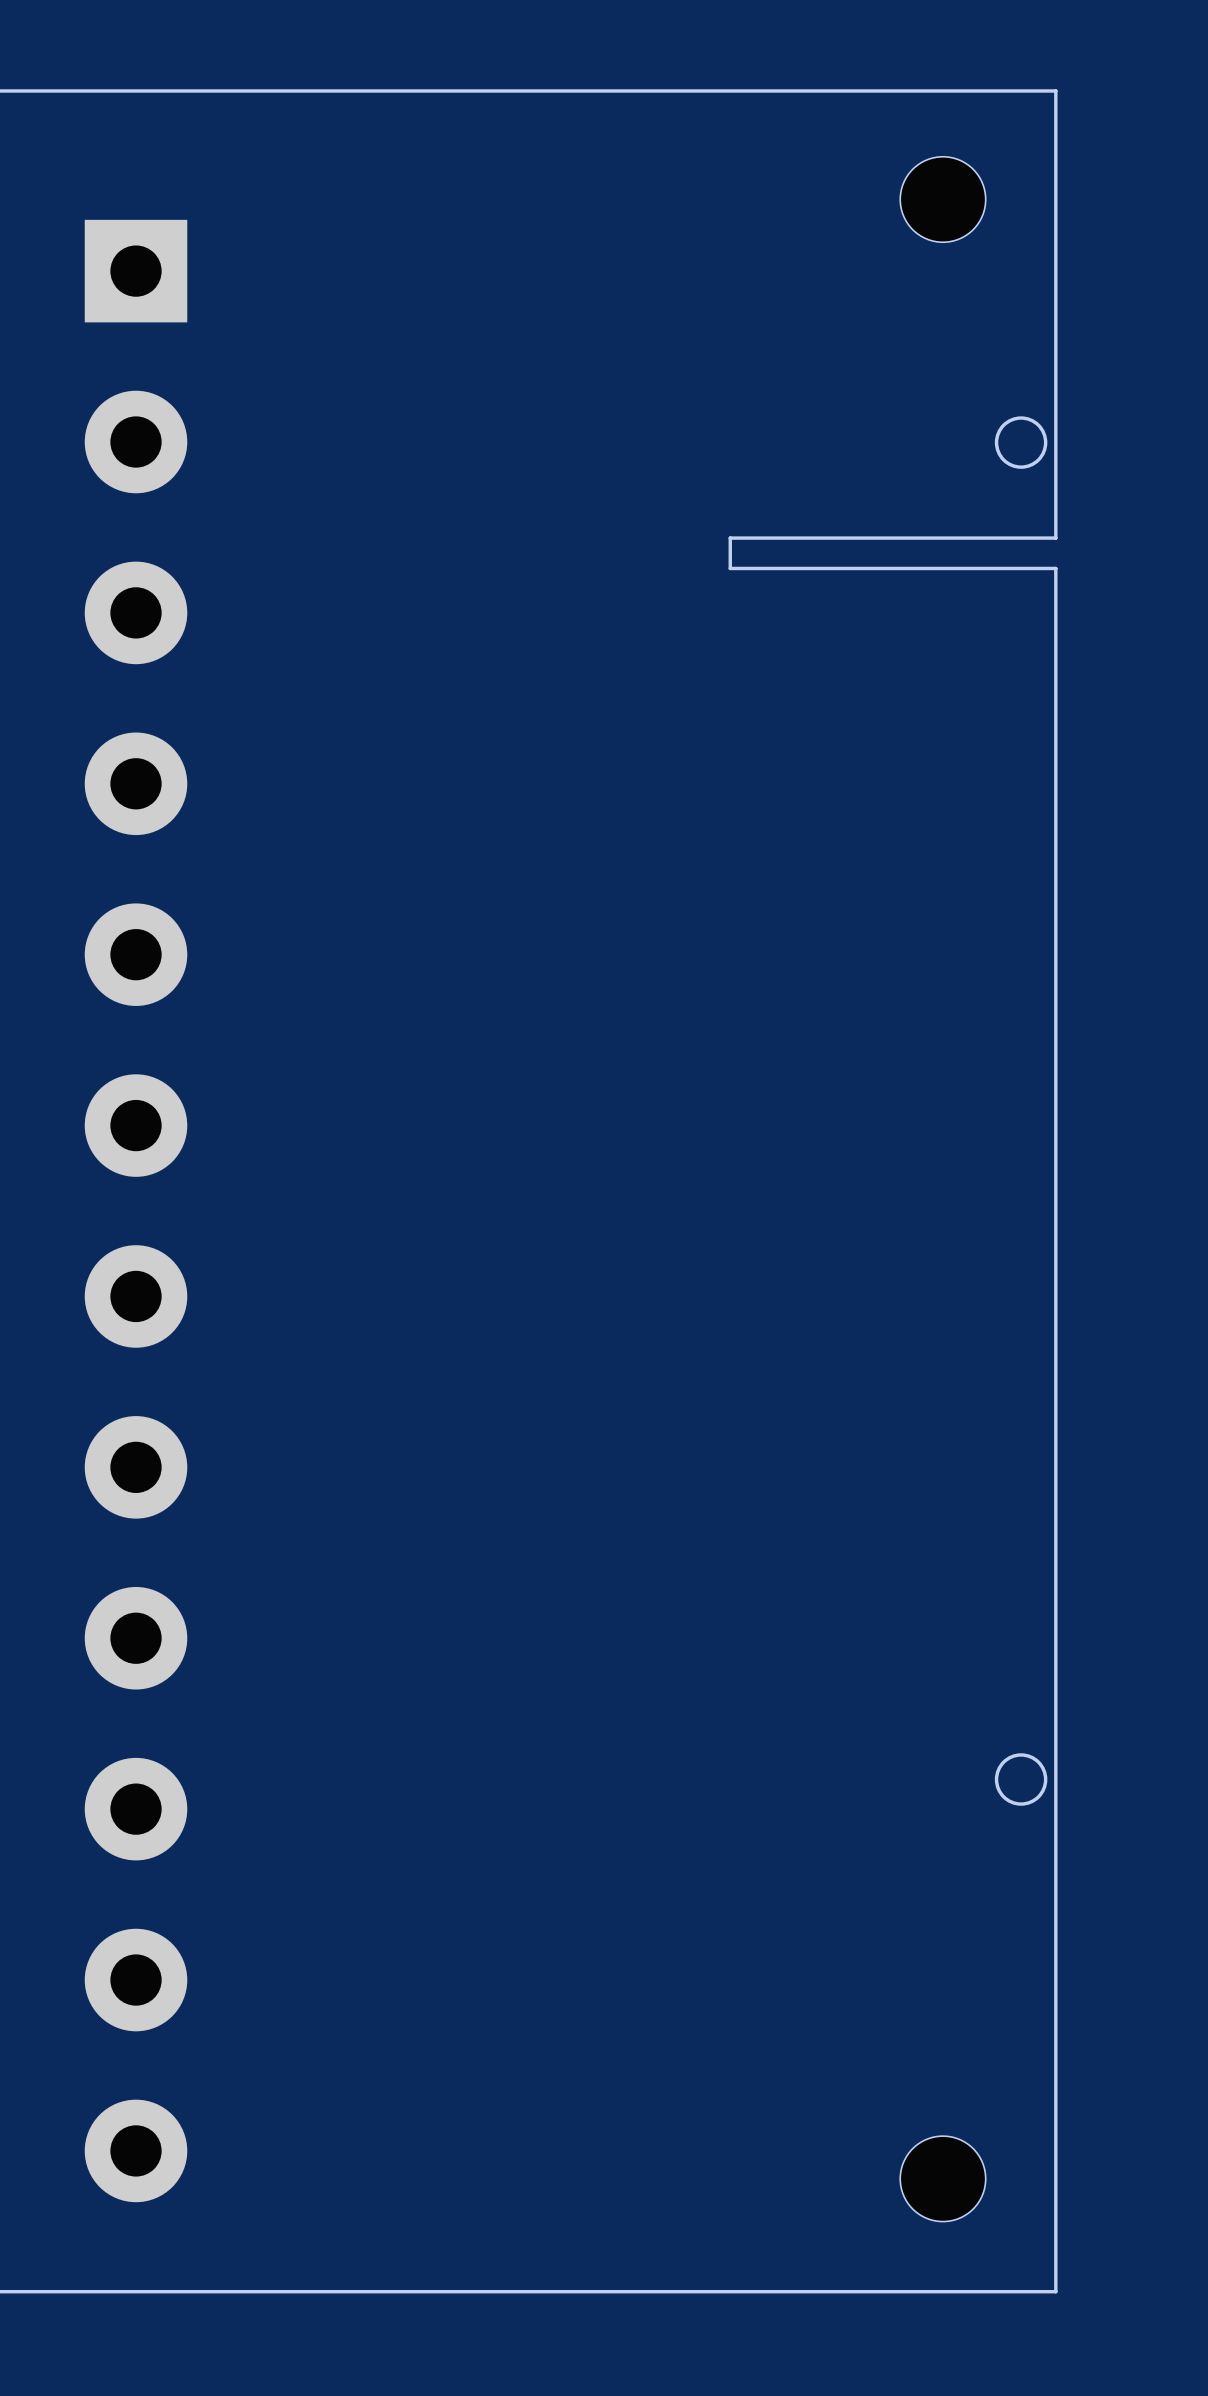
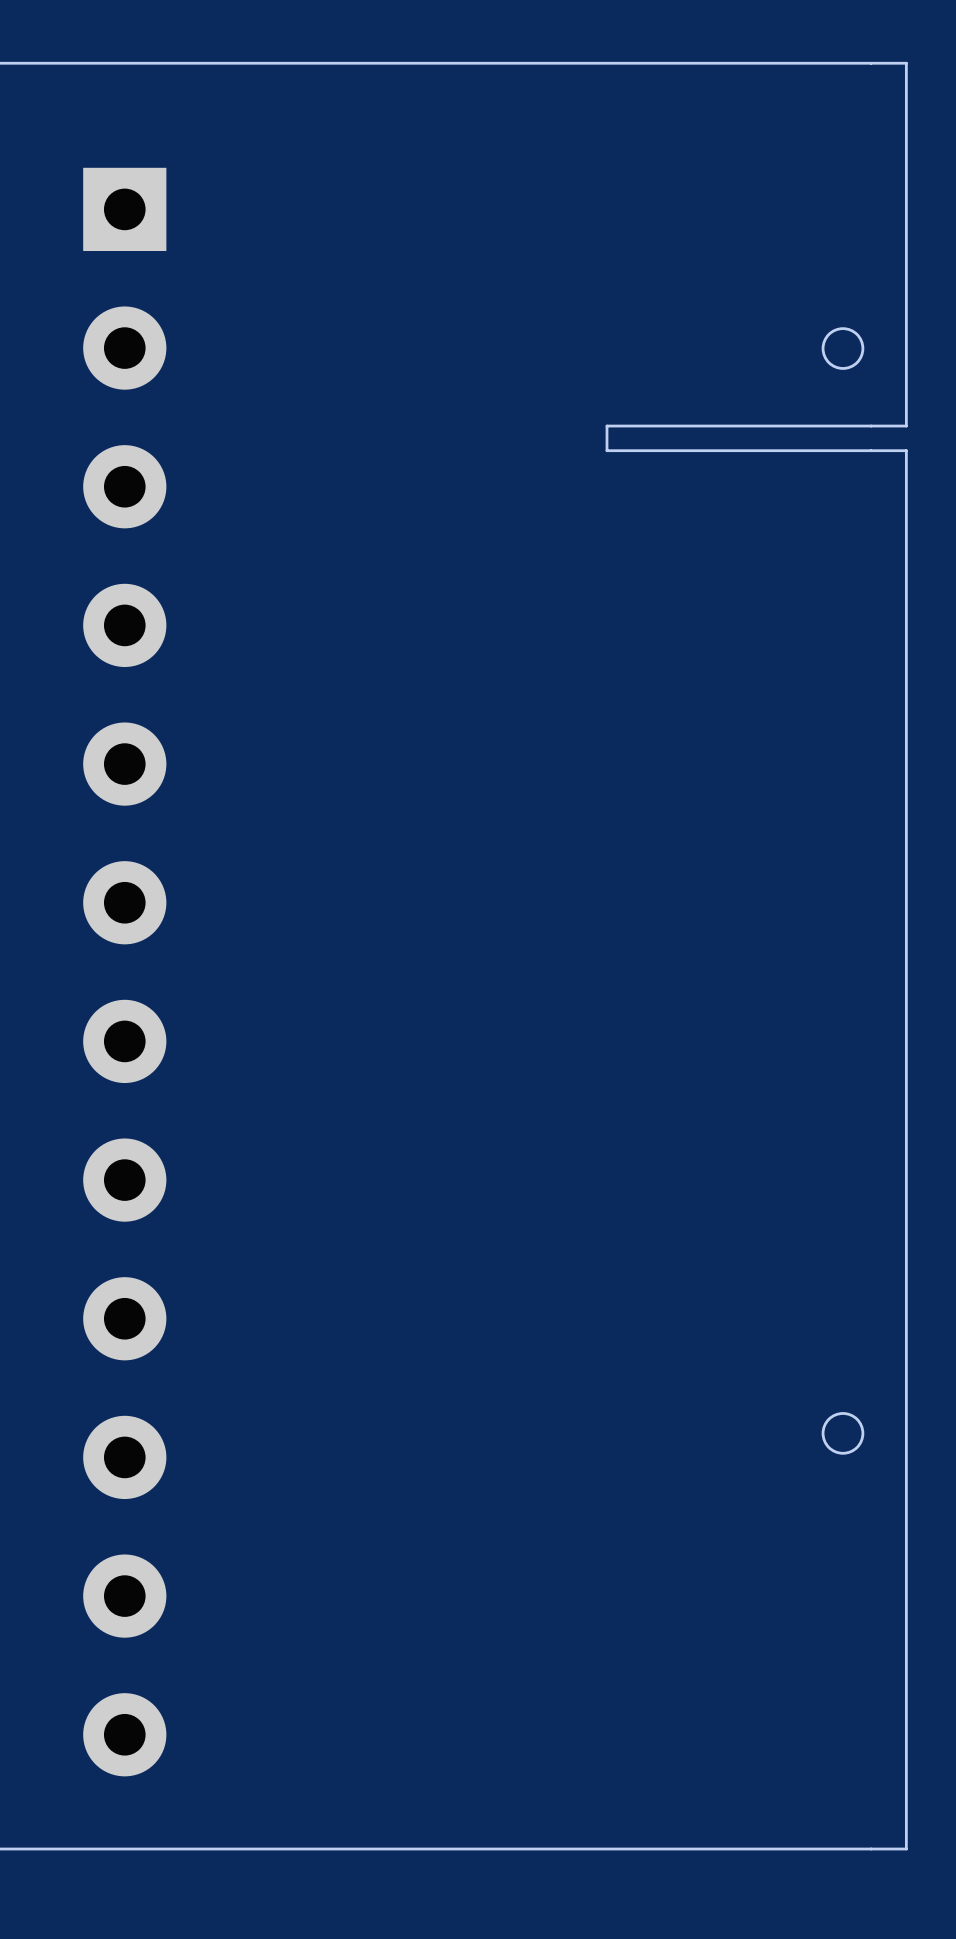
board edge: (1055, 90) (1055, 538) -> (871, 63) (906, 63) (906, 426) (871, 426)
part: (942, 199) -> none
board edge: (1055, 568) (1055, 2291) -> (871, 450) (906, 450) (906, 1848) (871, 1848)
part: (942, 2178) -> none

